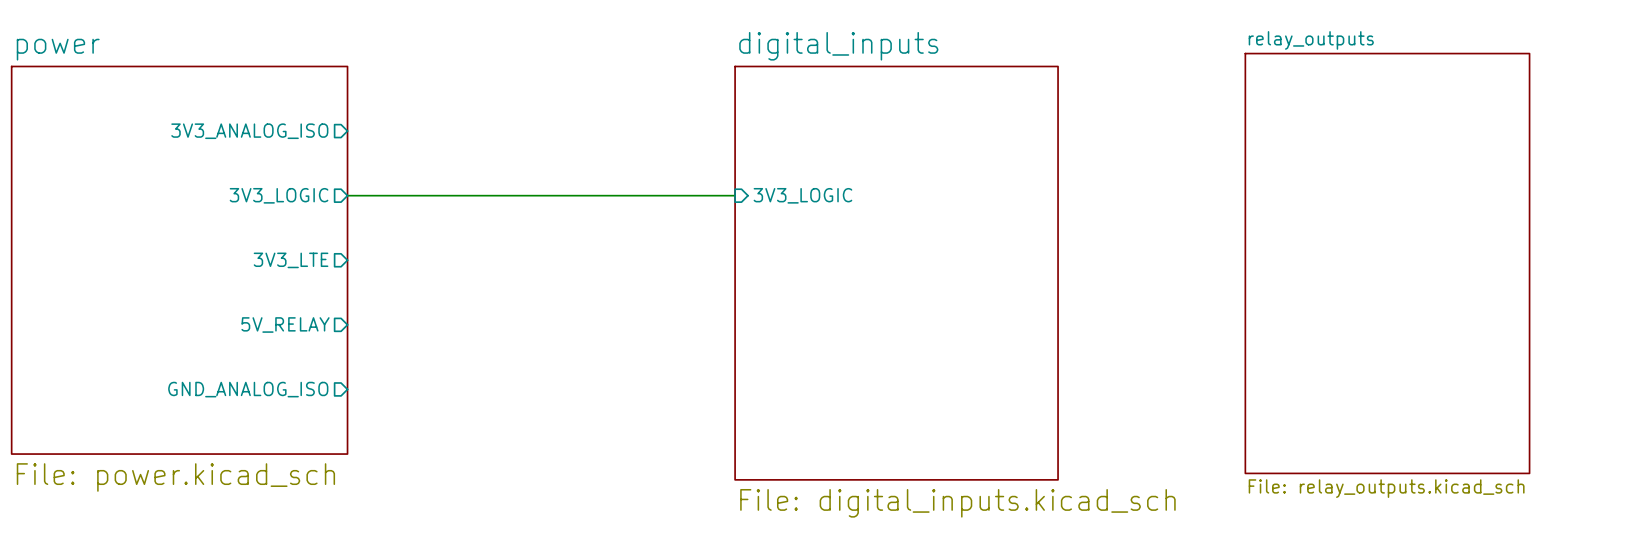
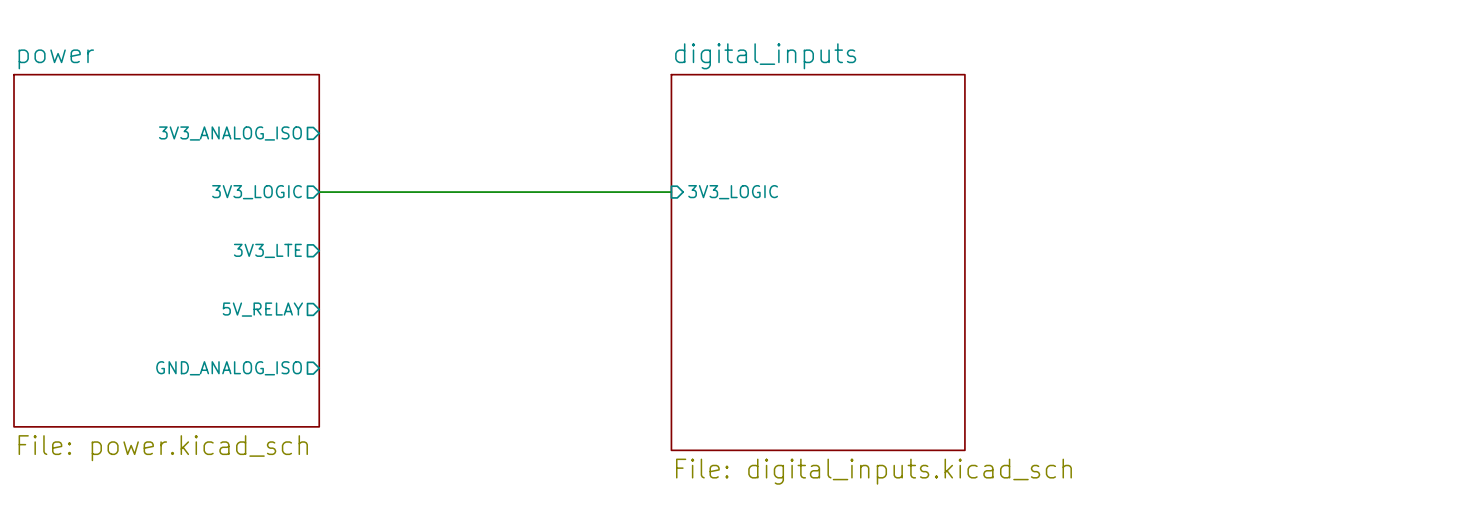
sheet relay_outputs: File: relay_outputs.kicad_sch (1387, 263) -> none

